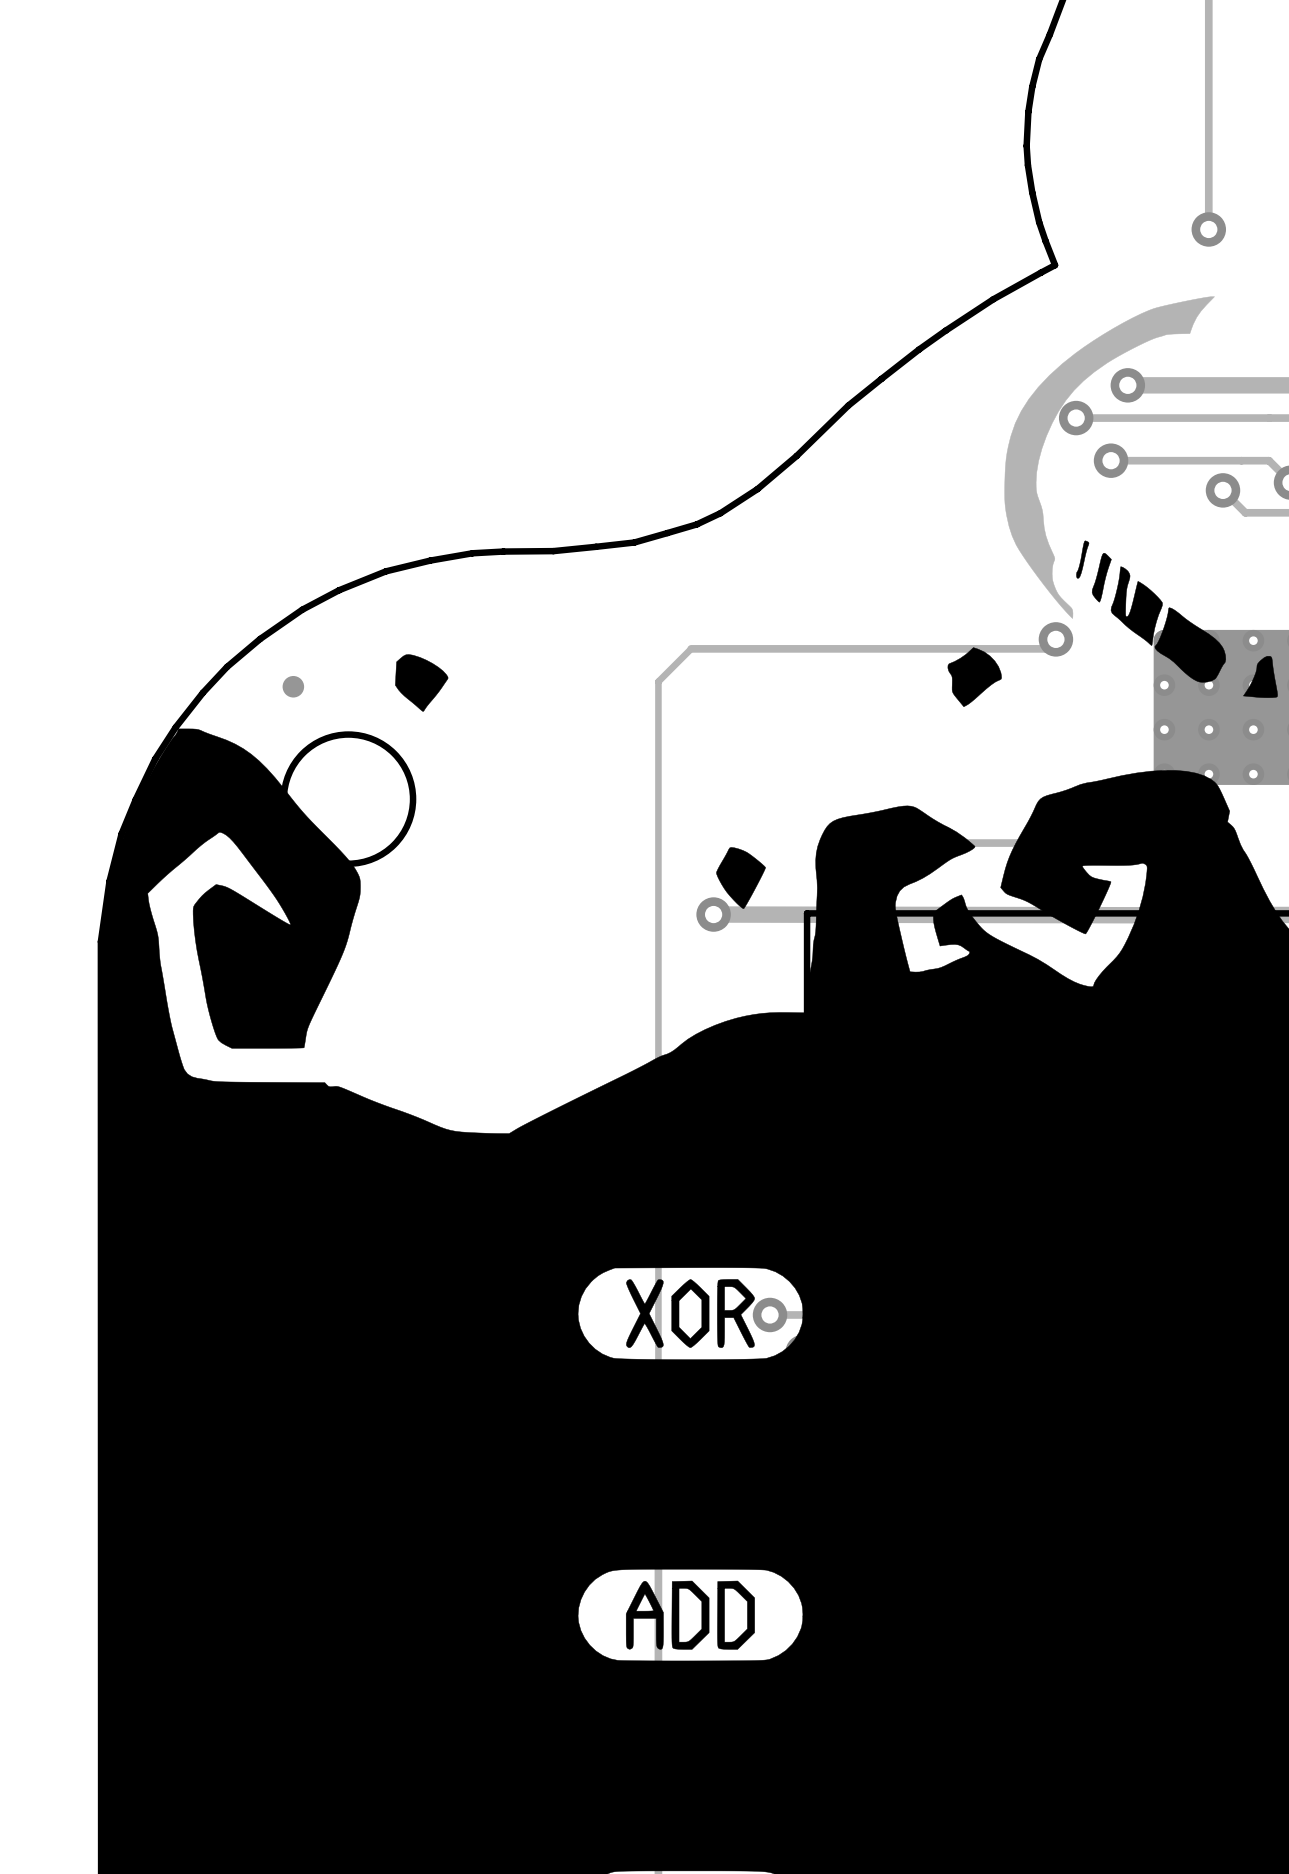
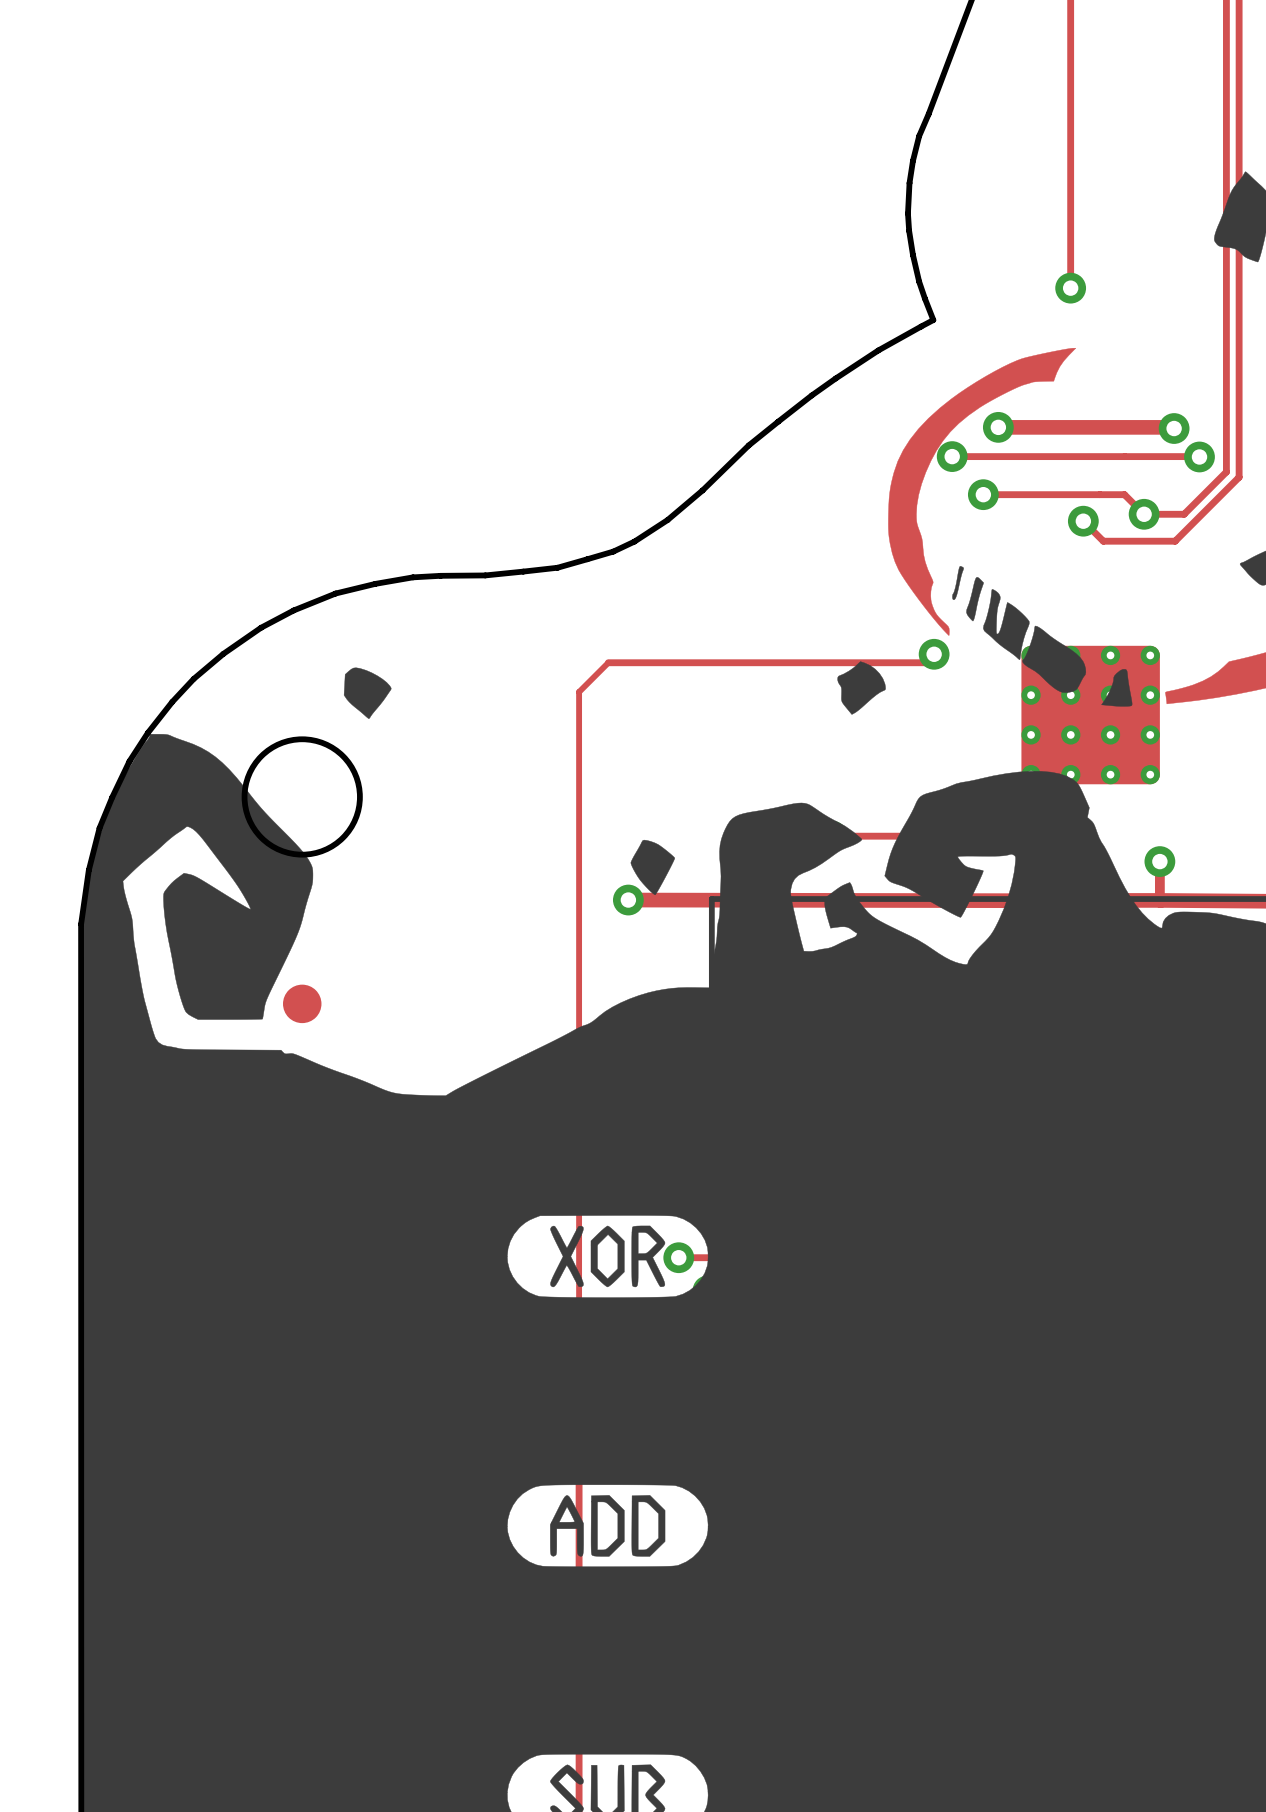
part: (293, 686) -> none
part: none -> (302, 1003)

